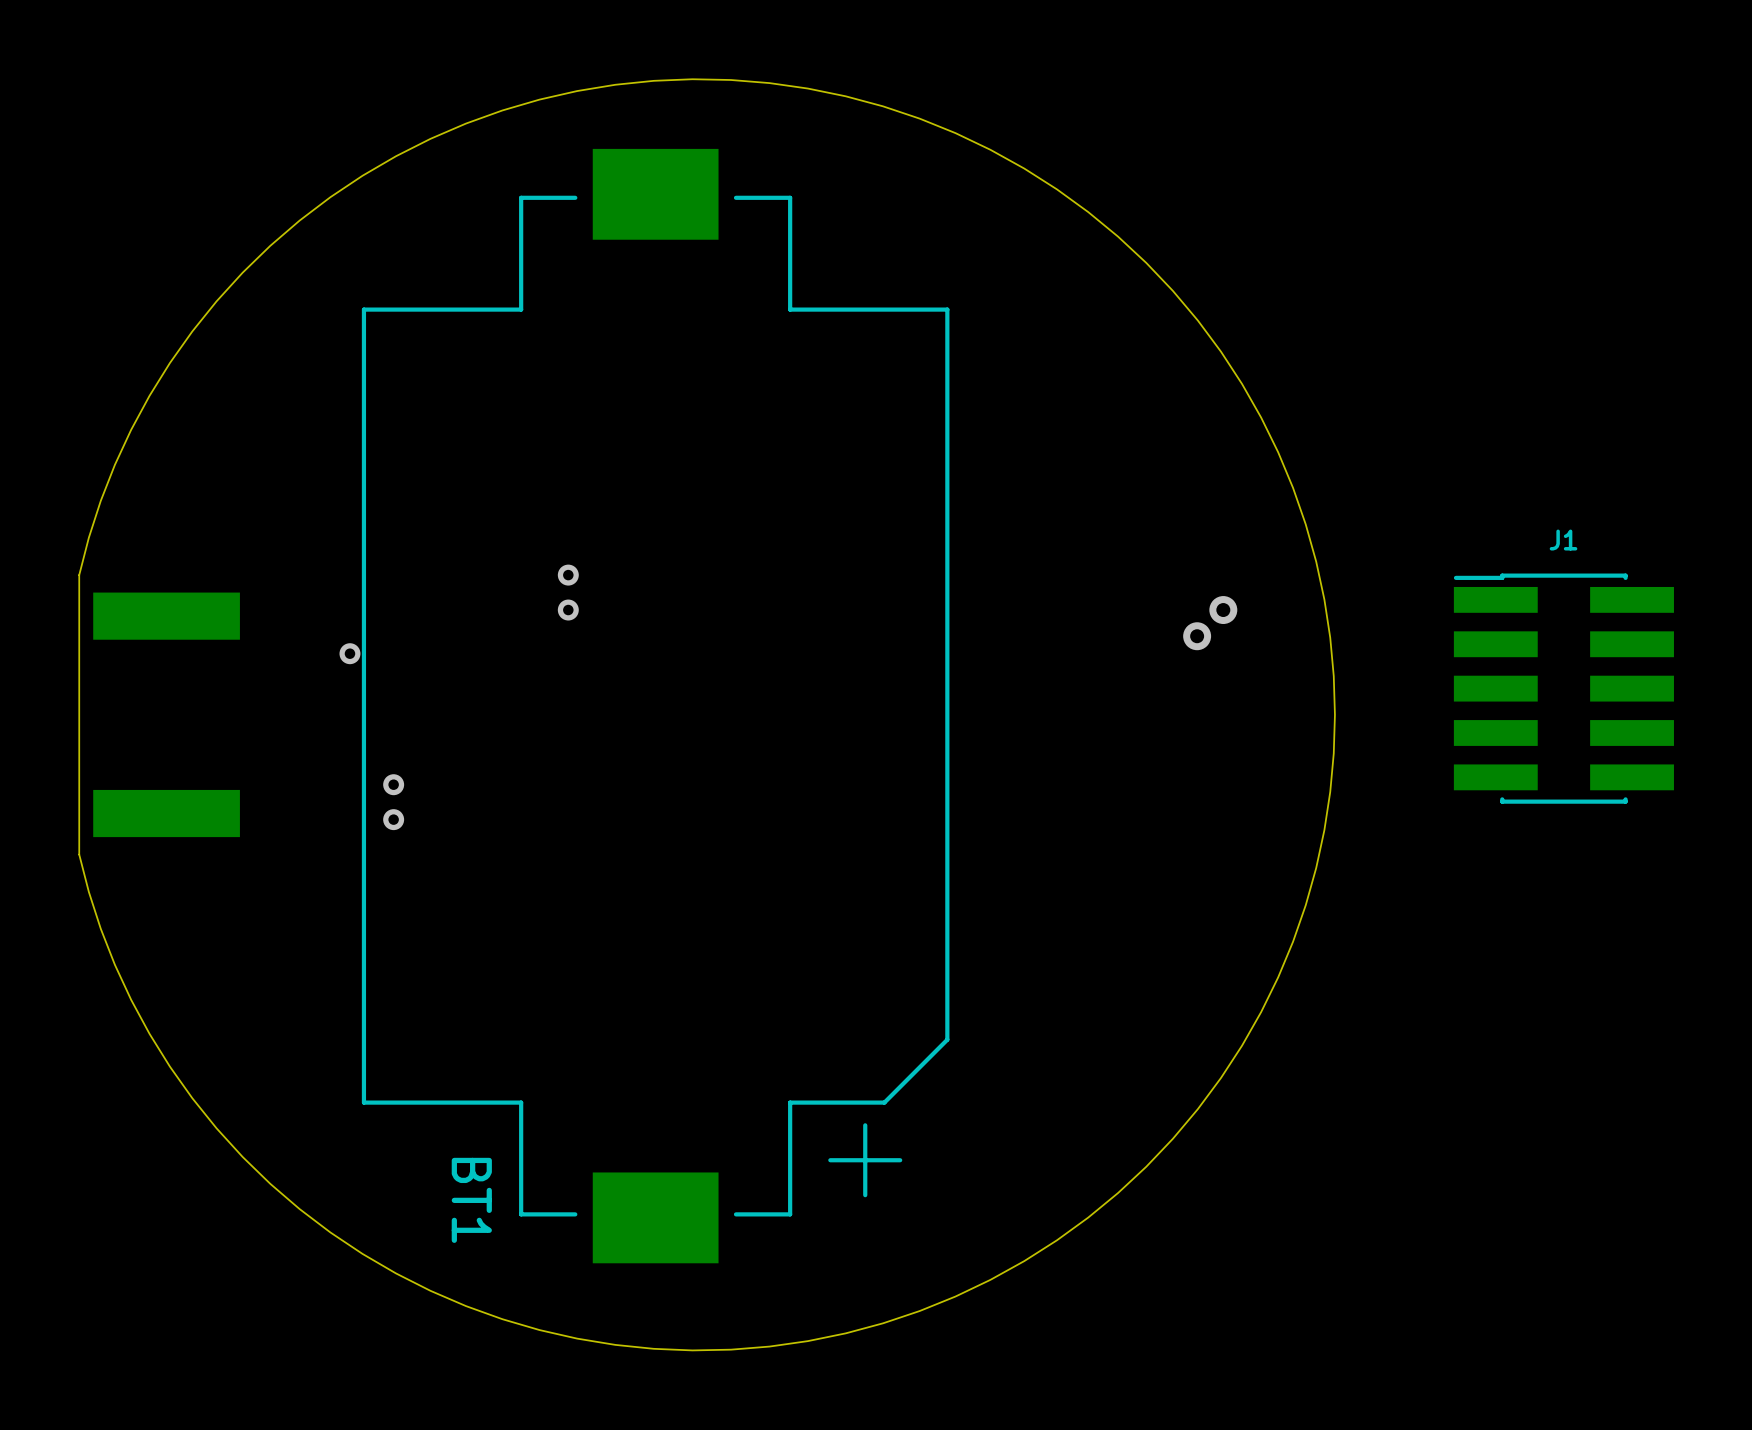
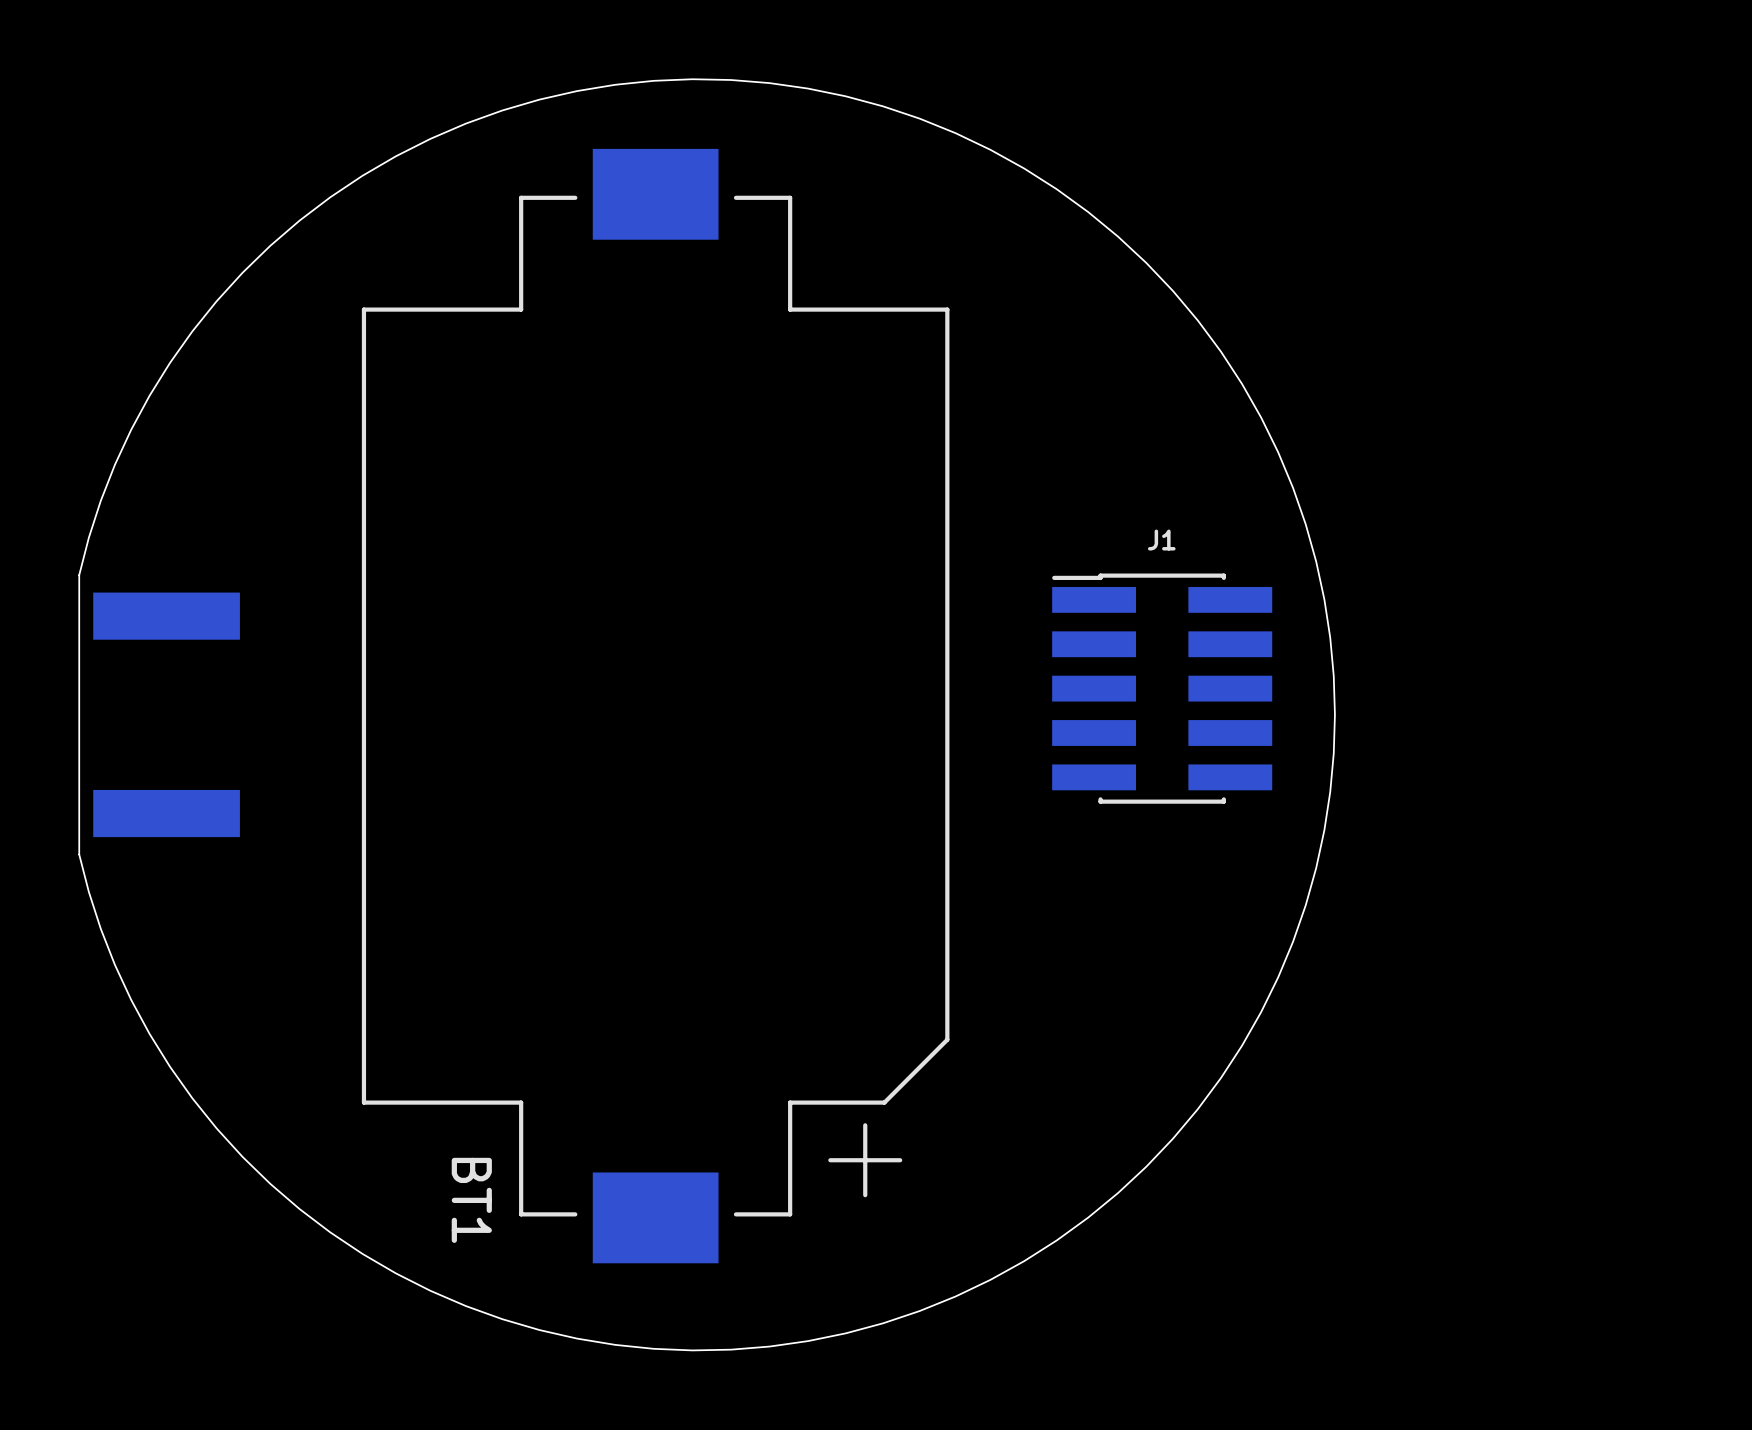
via: (568, 575) -> none
via: (568, 610) -> none
via: (1223, 610) -> none
via: (1197, 636) -> none
via: (349, 653) -> none
J1 position: (1563, 688) -> (1162, 688)
via: (393, 784) -> none
via: (393, 819) -> none

